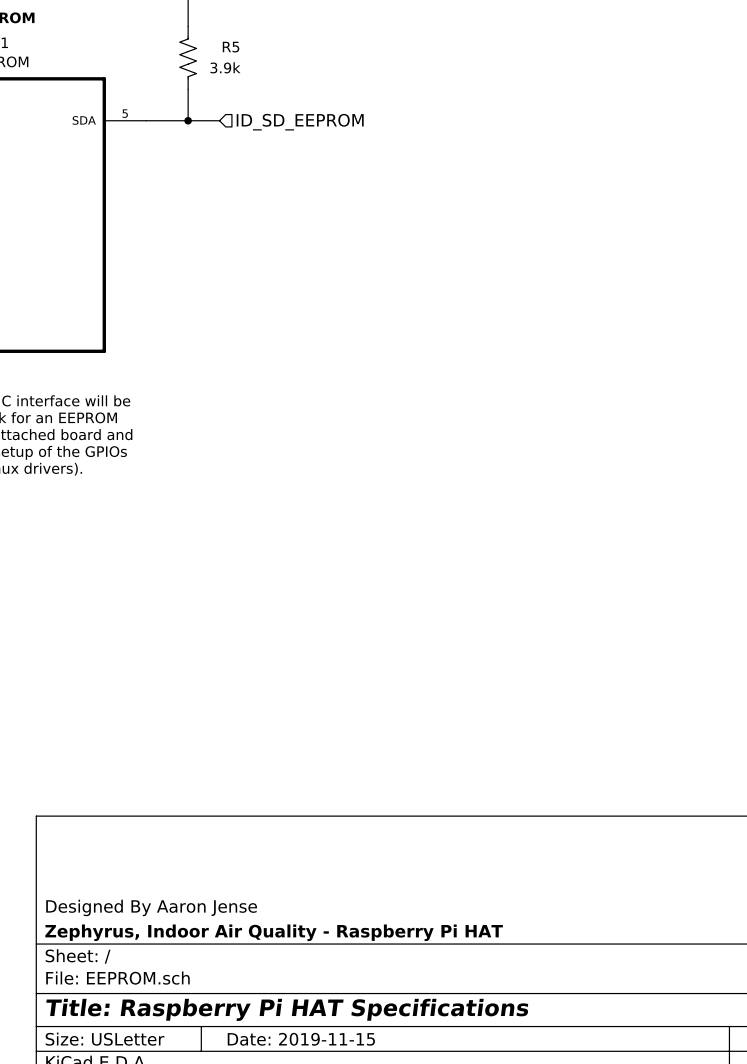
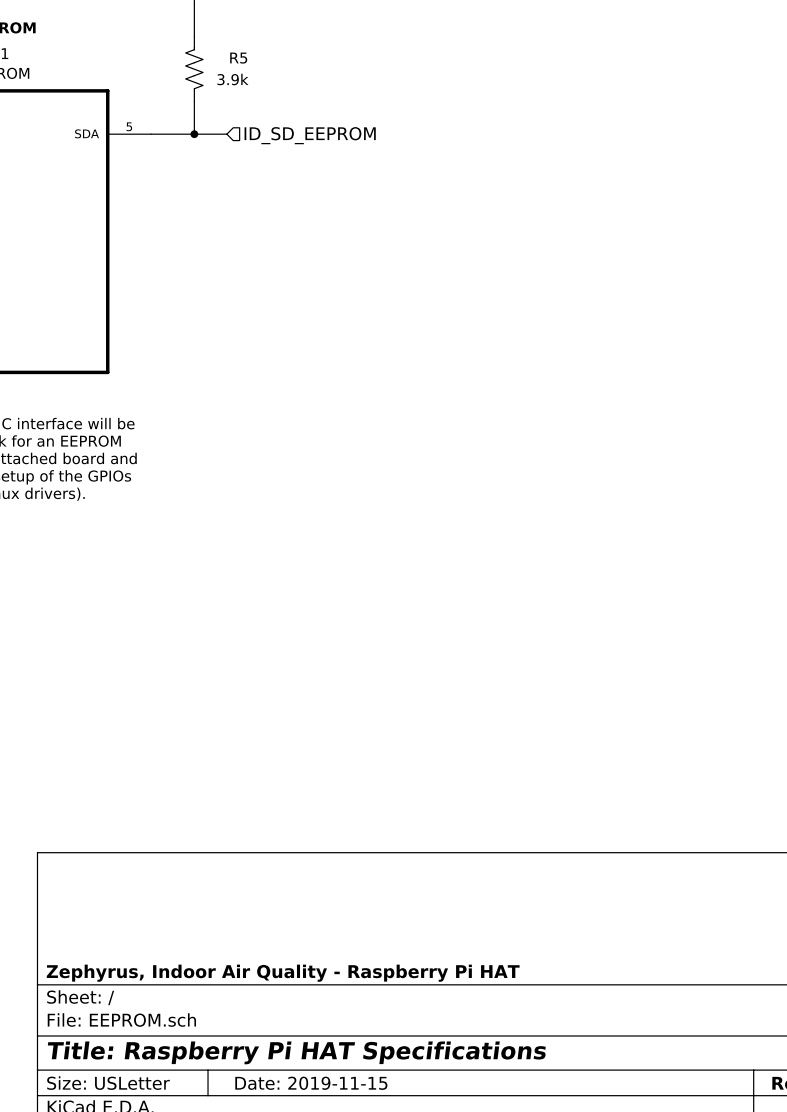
title block: Designed By Aaron Jense (151, 907) -> none

